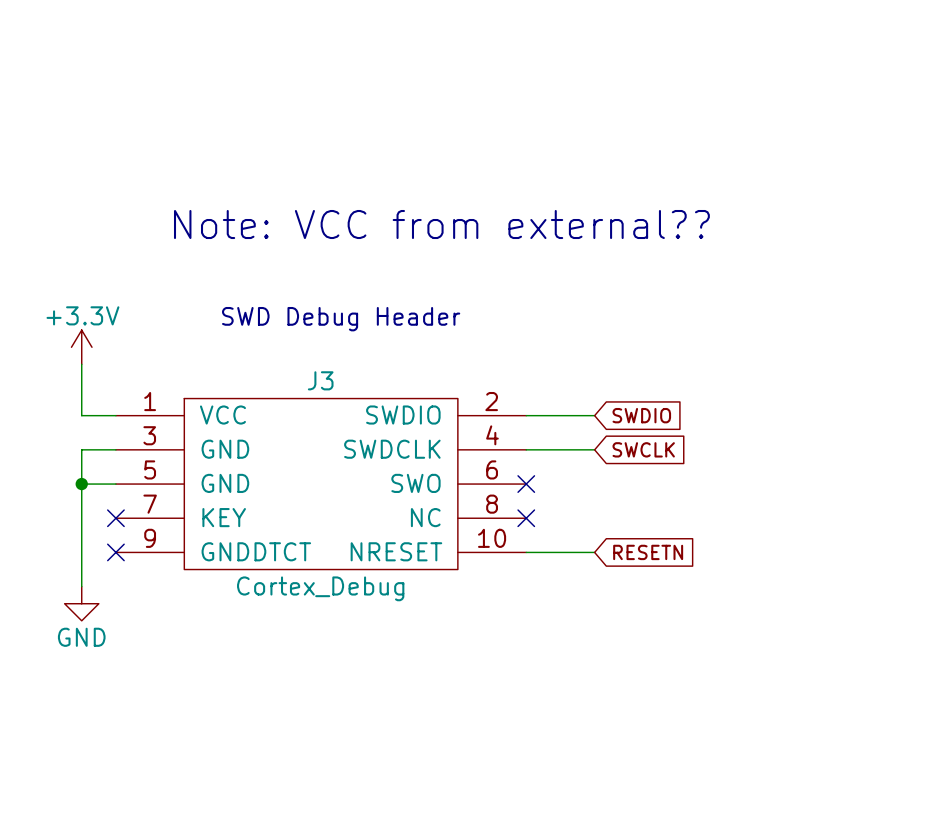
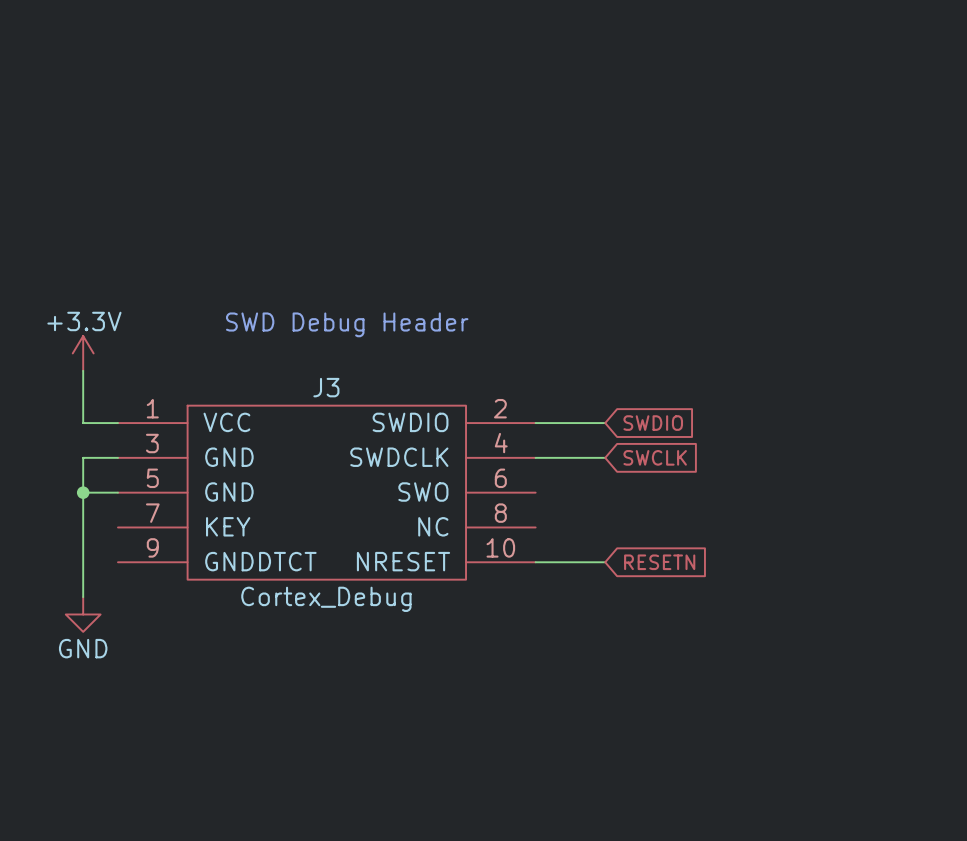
text: Note: VCC from external?? (441, 224) -> none
no-connect mark: (526, 484) -> none
no-connect mark: (115, 518) -> none
no-connect mark: (526, 518) -> none
no-connect mark: (115, 552) -> none

